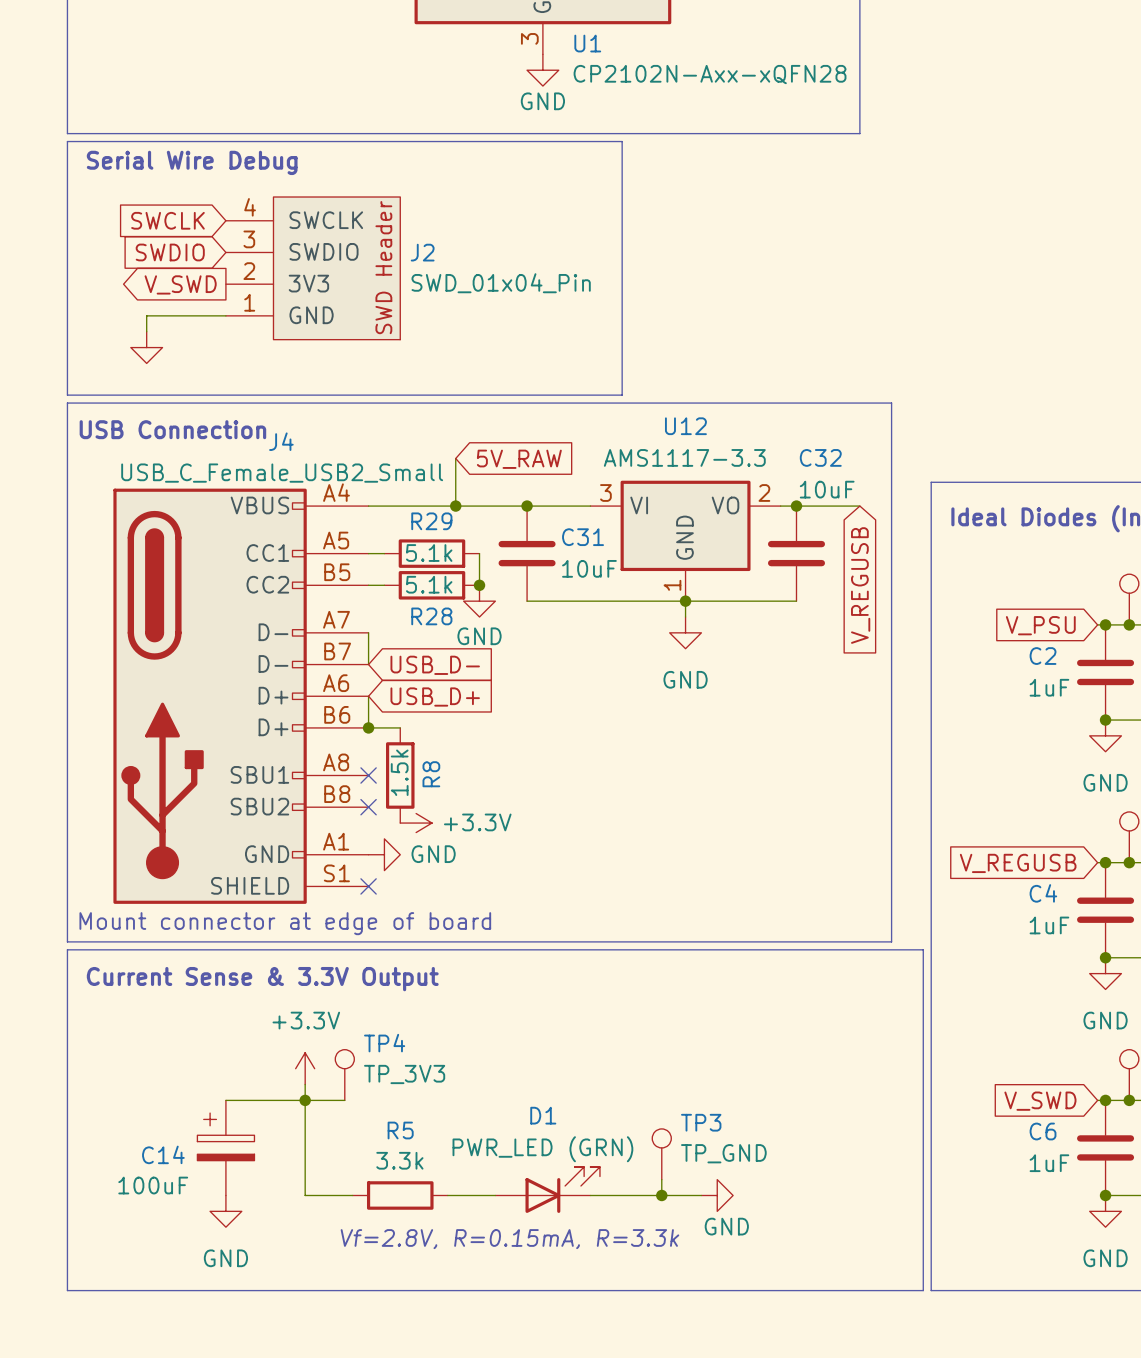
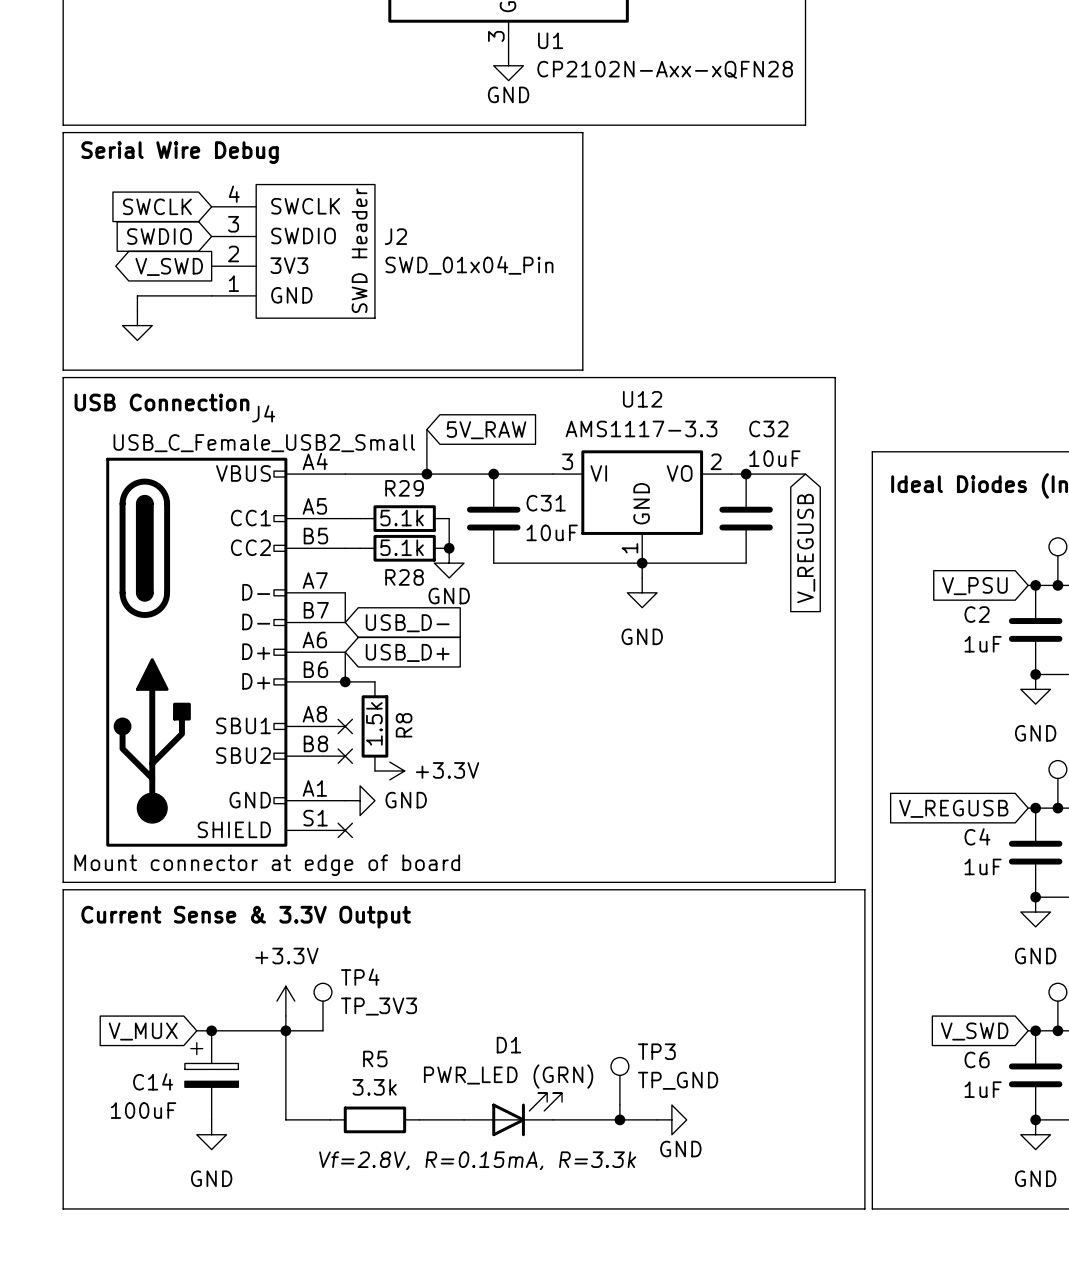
wire: none -> (196, 1030) (211, 1030)
junction: none -> (211, 1030)
global label: none -> V_MUX (143, 1031)

